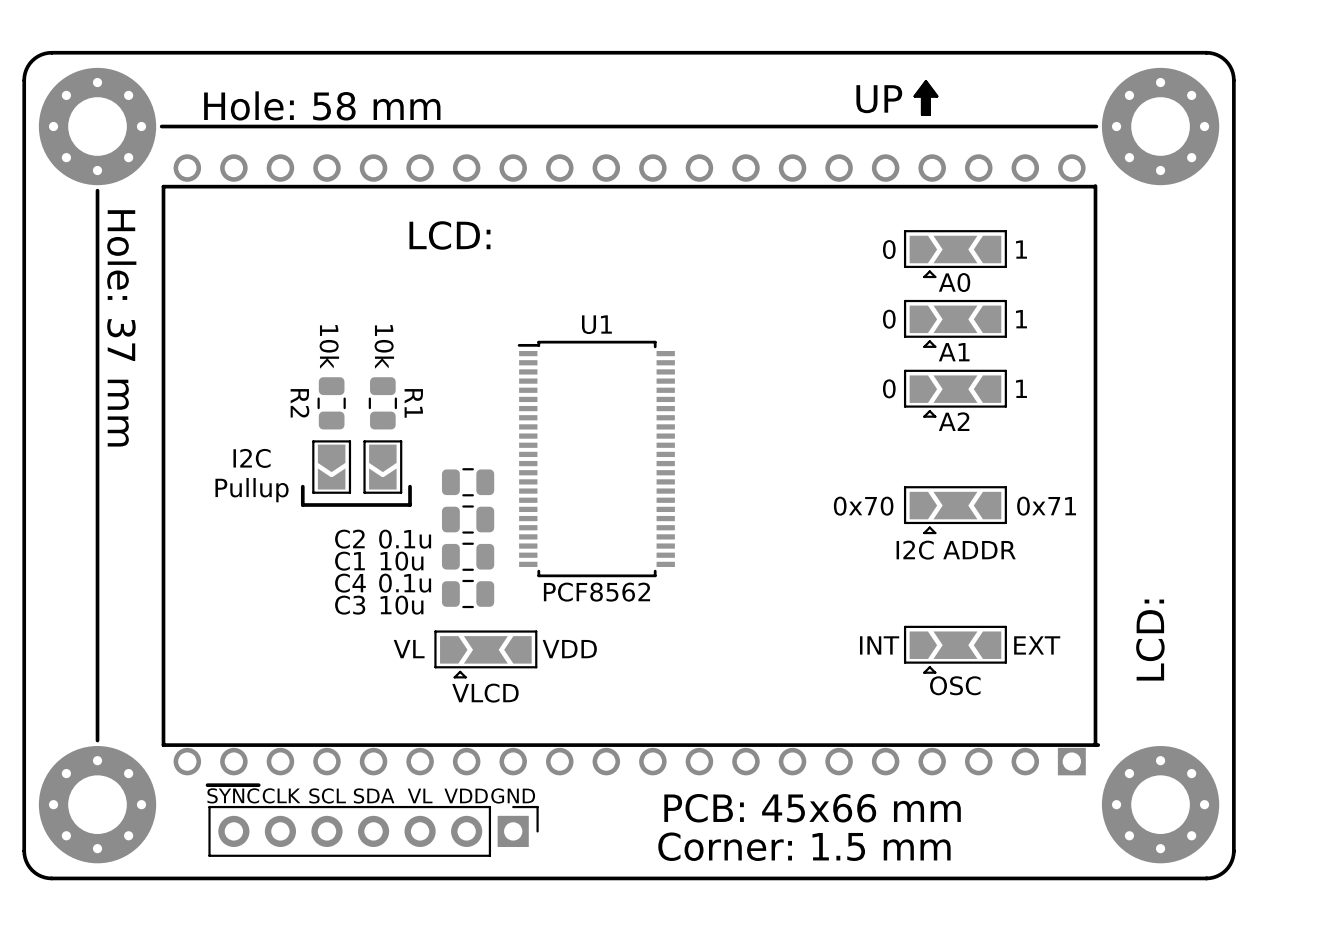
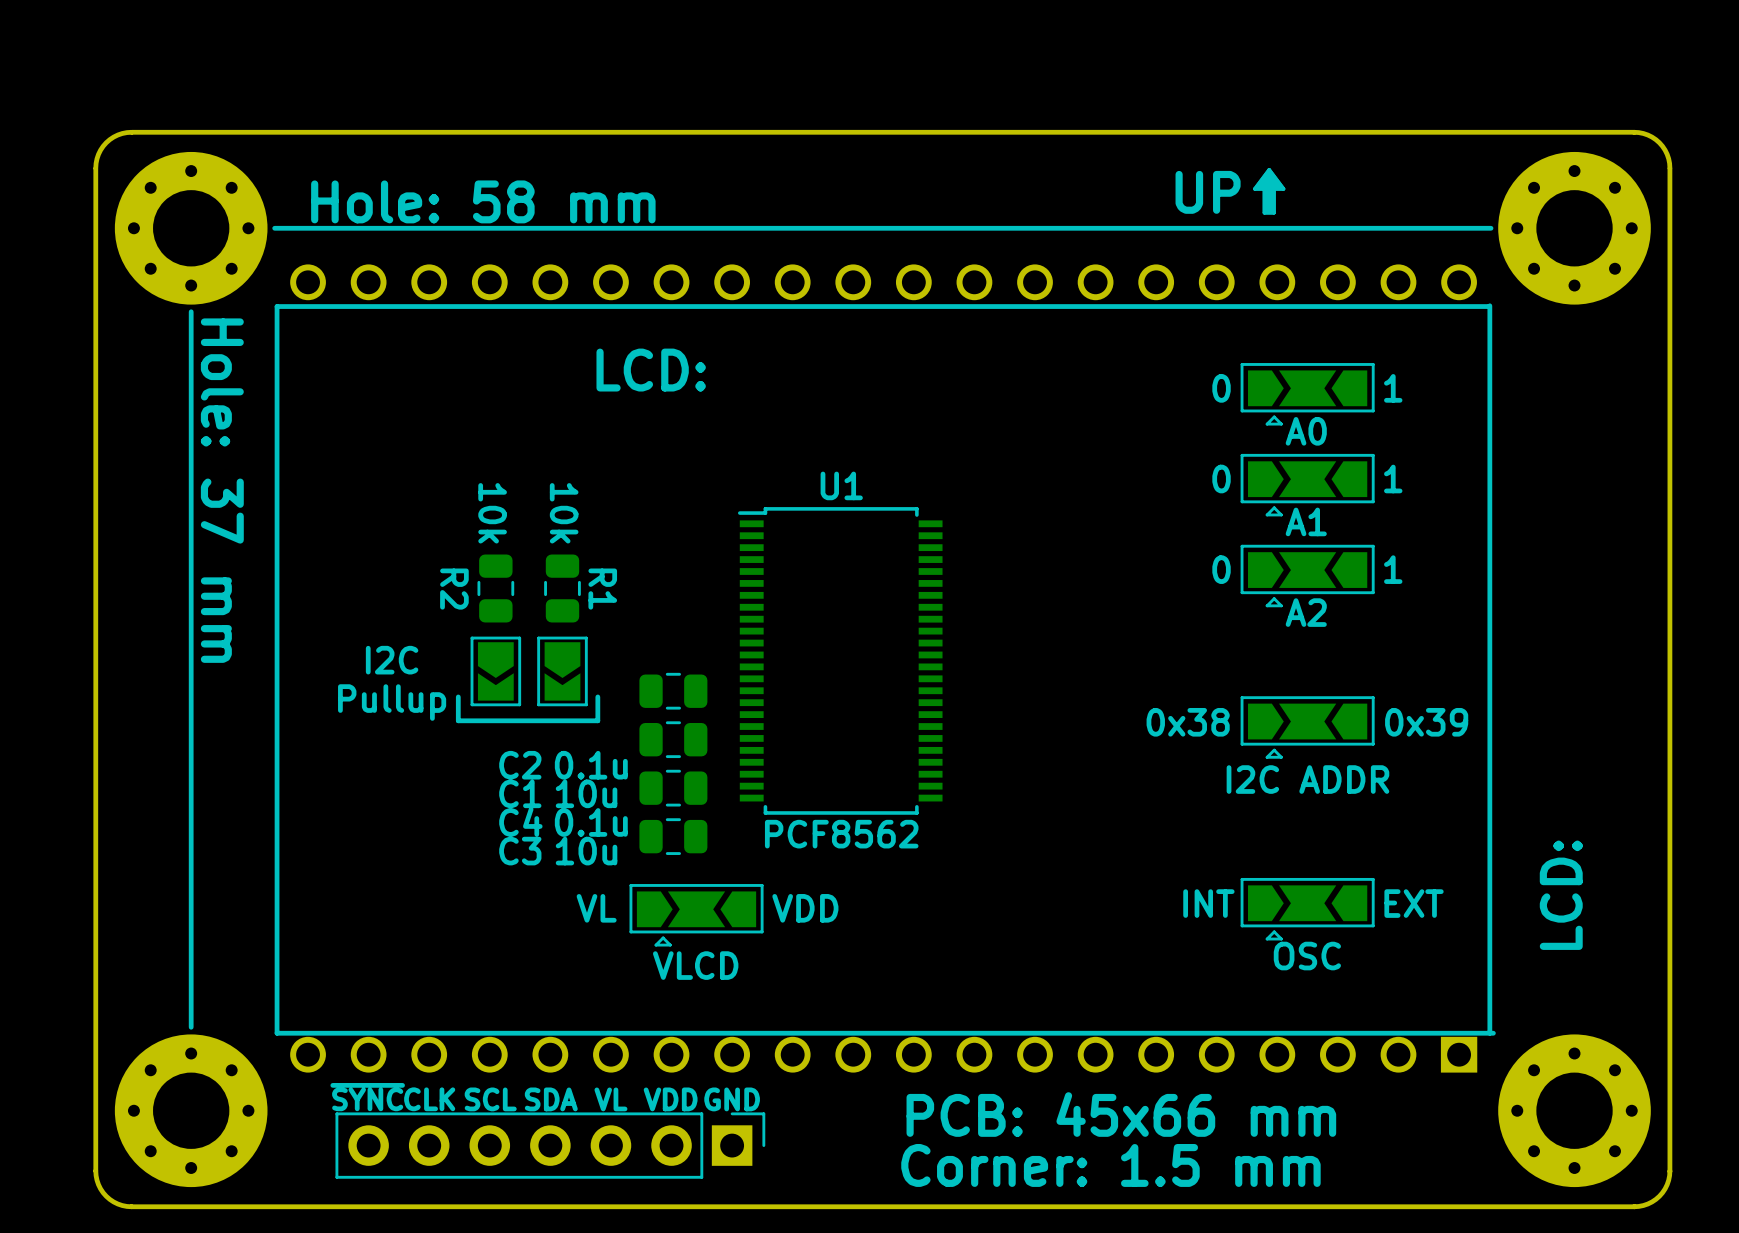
text: 0x70 (863, 506) -> 0x38 (1188, 722)
text: 0x71 (1046, 506) -> 0x39 (1426, 722)

